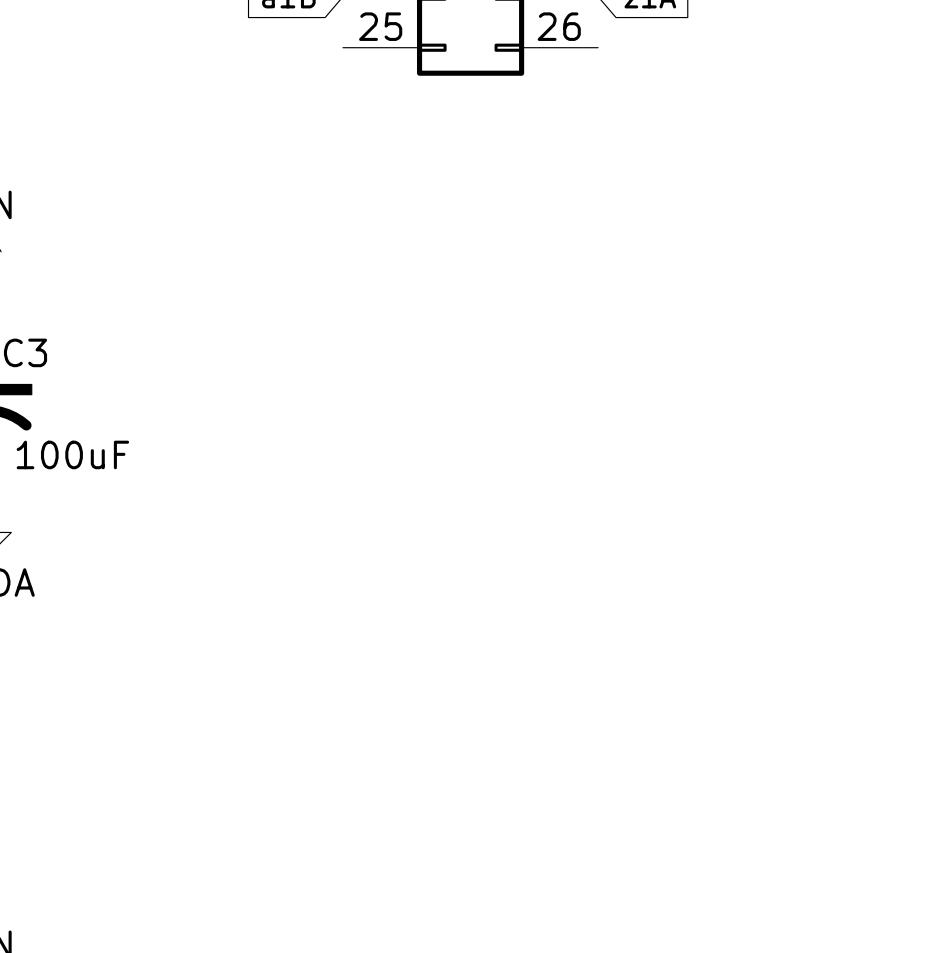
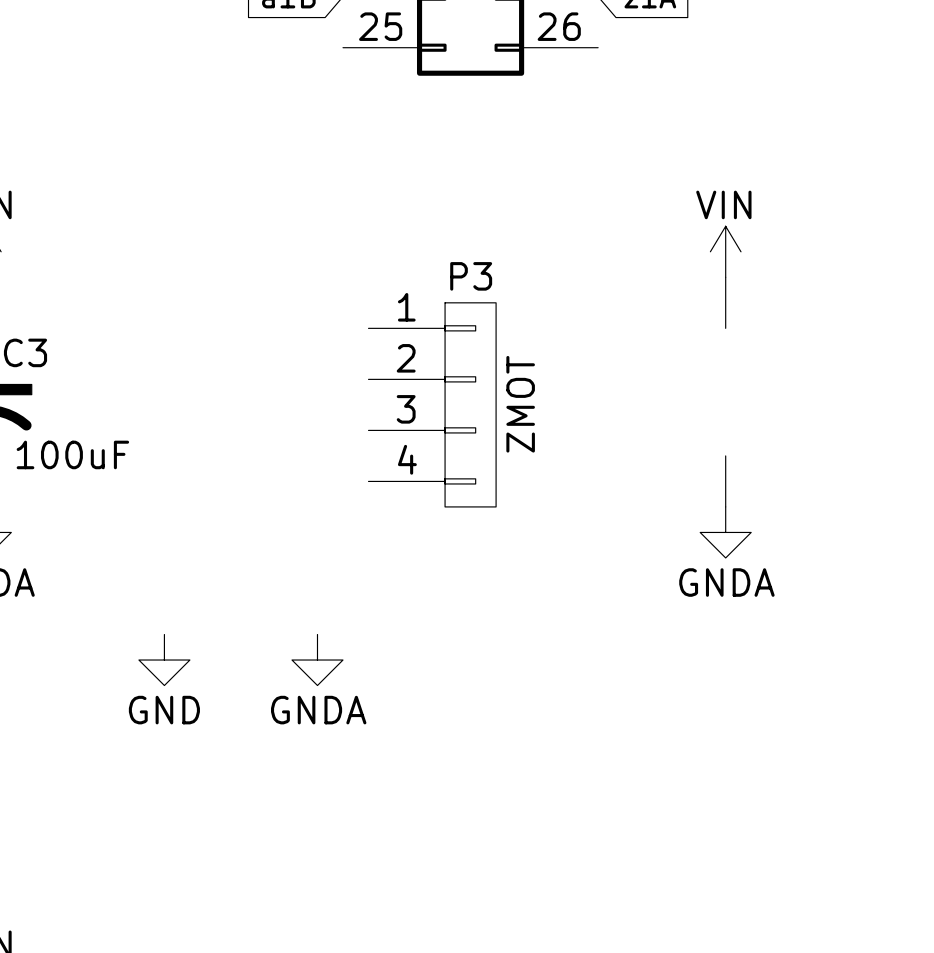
power symbol: none -> VIN (725, 251)
wire: none -> (725, 277) (725, 328)
P3: none -> ZMOT (432, 404)
wire: none -> (725, 455) (725, 506)
power symbol: none -> GNDA (725, 532)
power symbol: none -> GND (164, 660)
power symbol: none -> GNDA (317, 660)

